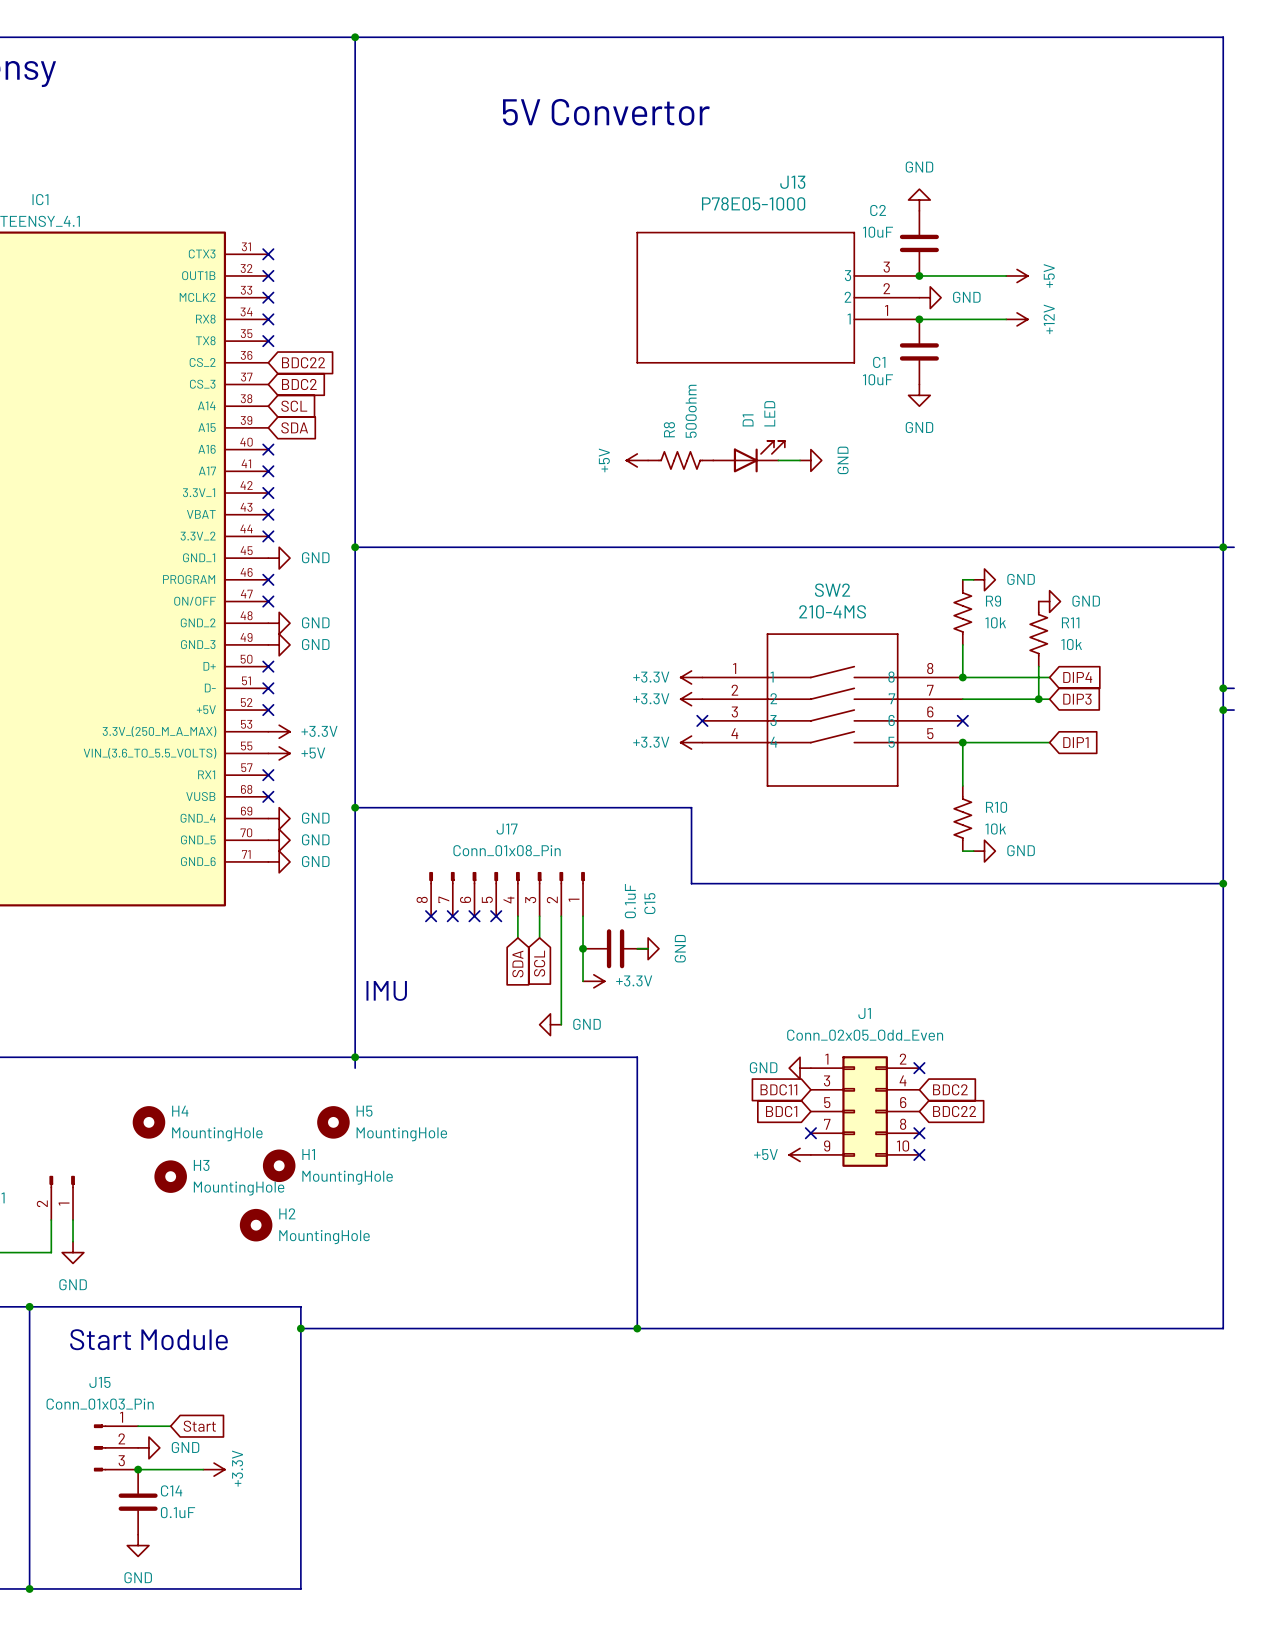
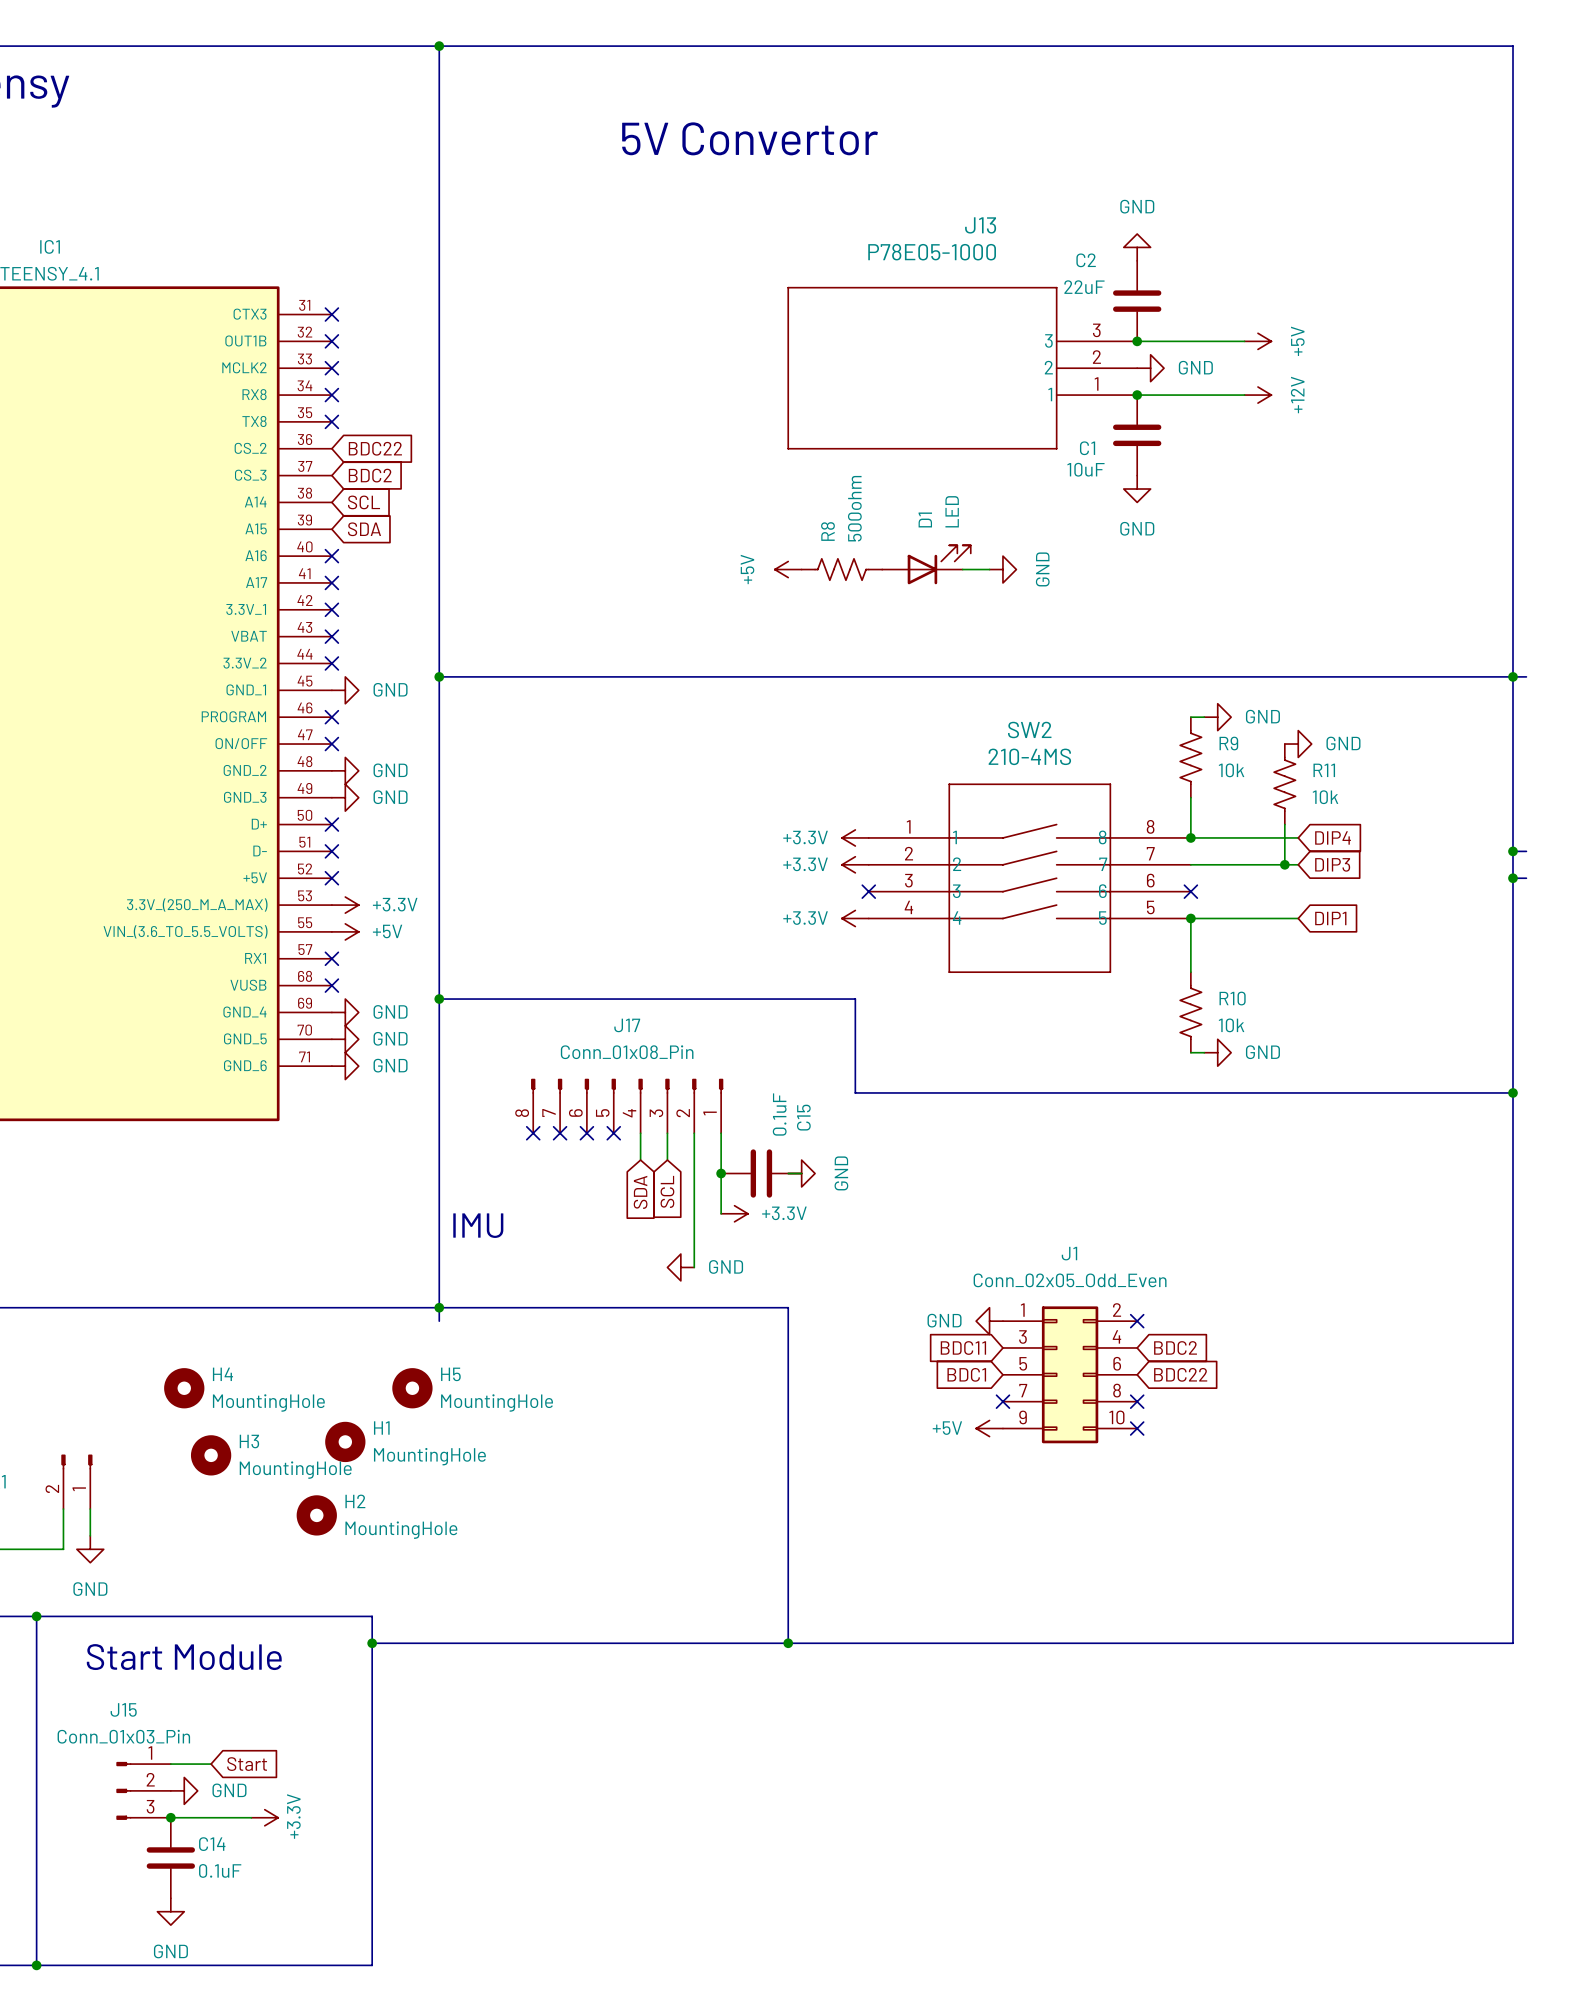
C2 value: 10uF (877, 232) -> 22uF (1084, 287)

